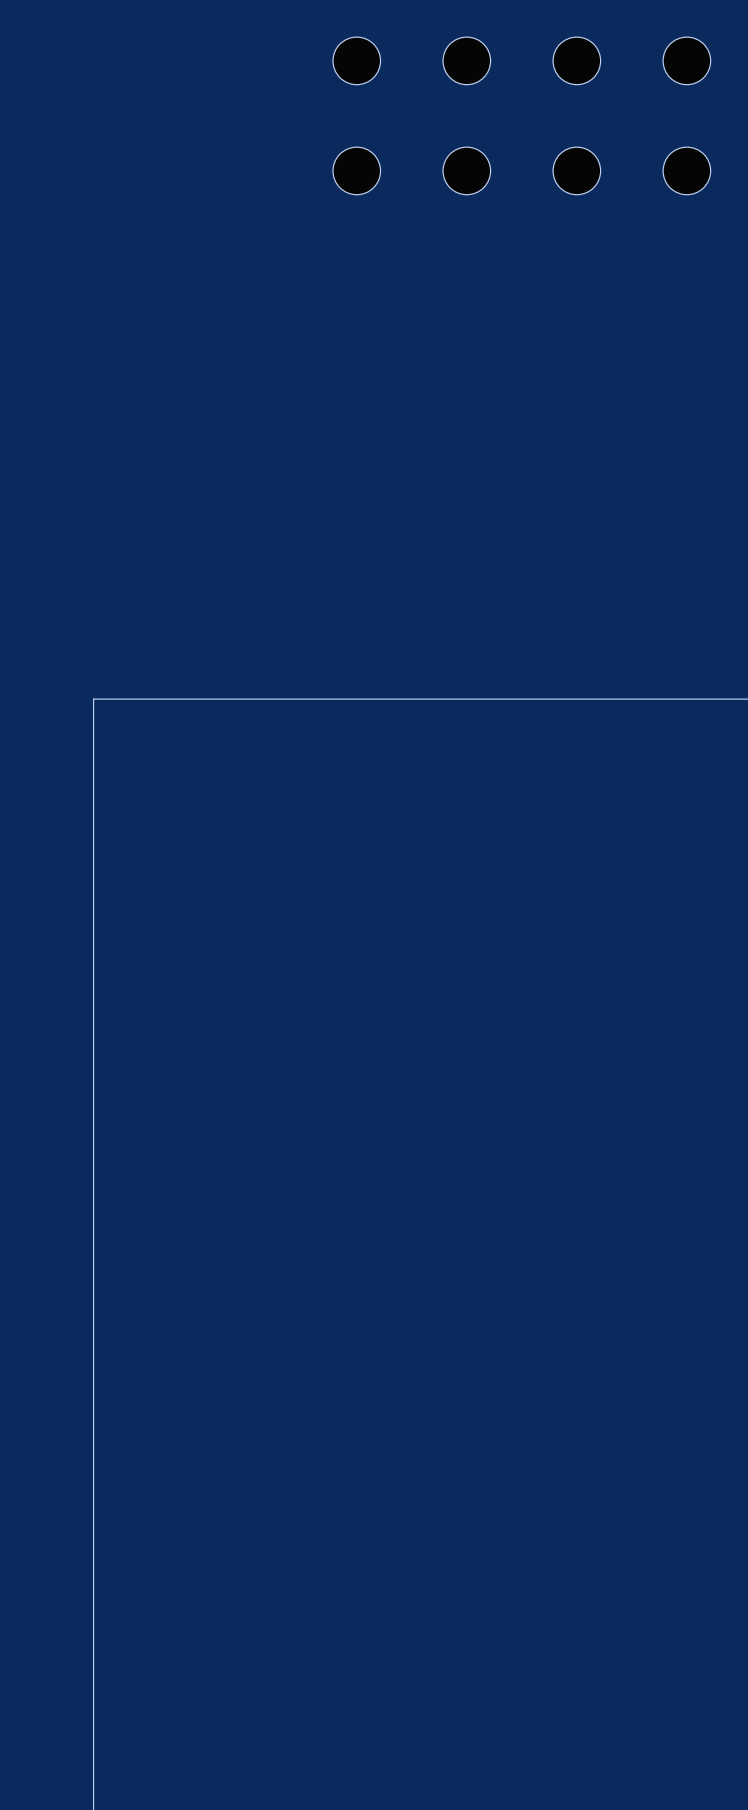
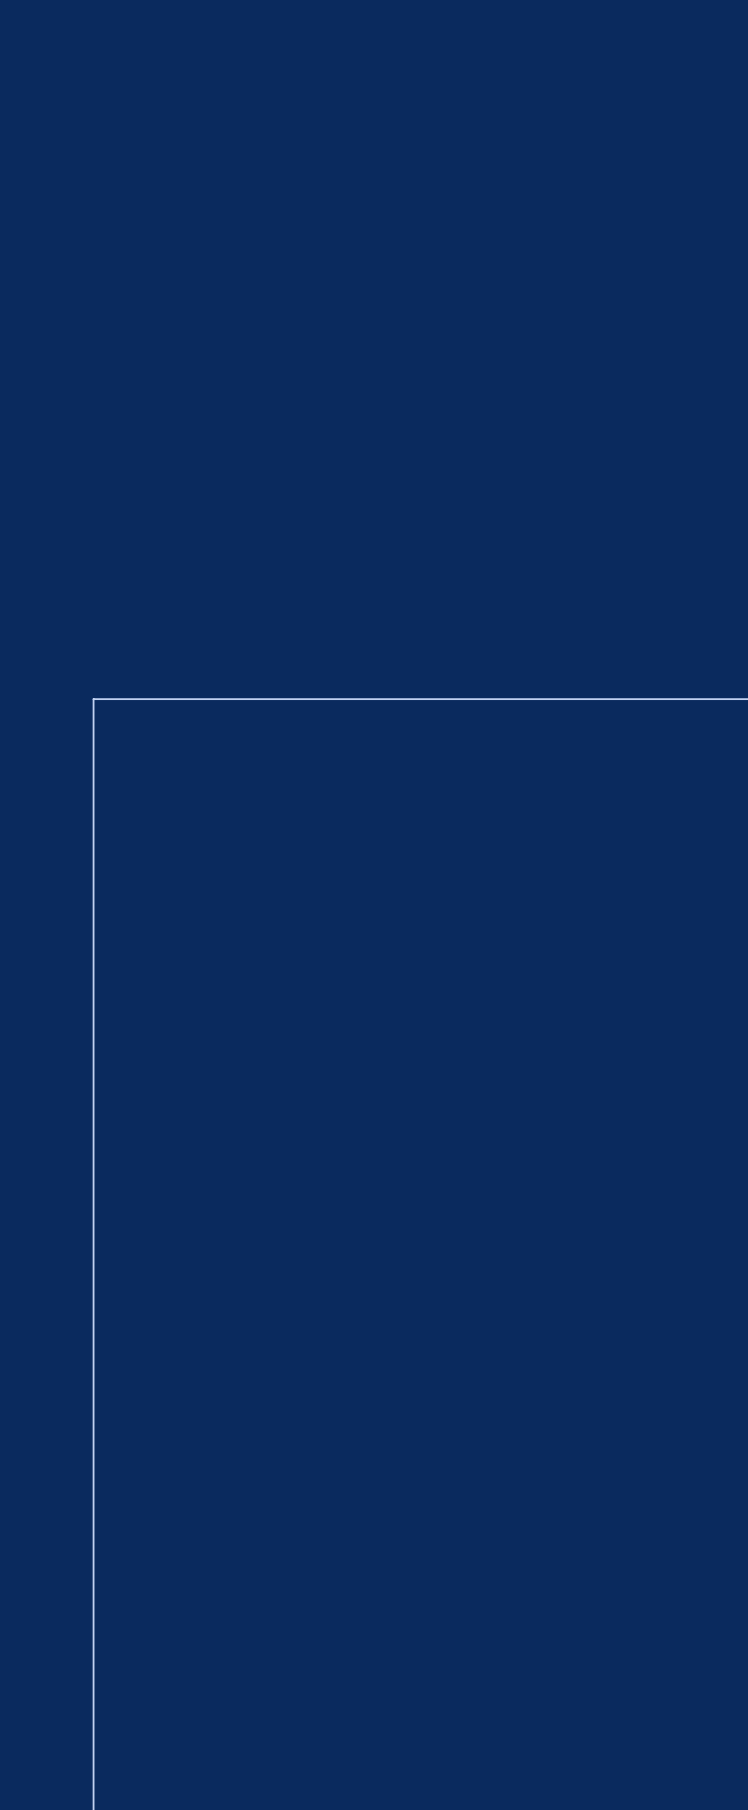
part: (356, 60) -> none
part: (466, 60) -> none
part: (576, 60) -> none
part: (686, 60) -> none
part: (356, 170) -> none
part: (466, 170) -> none
part: (576, 170) -> none
part: (686, 170) -> none

